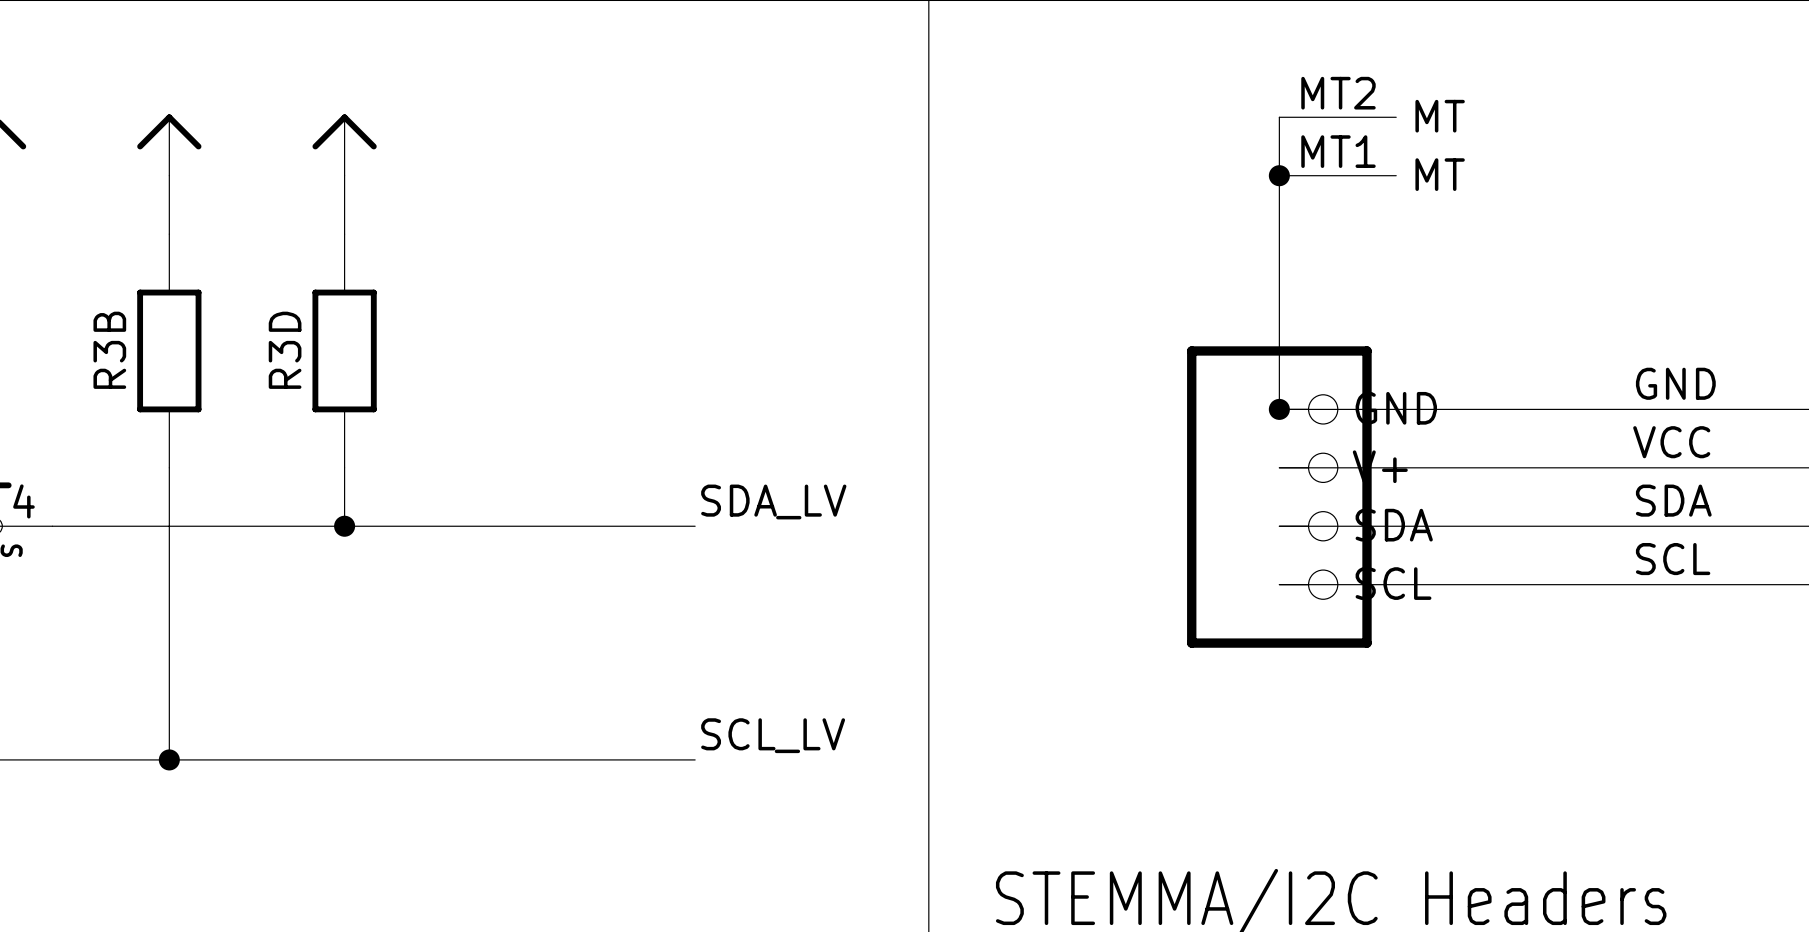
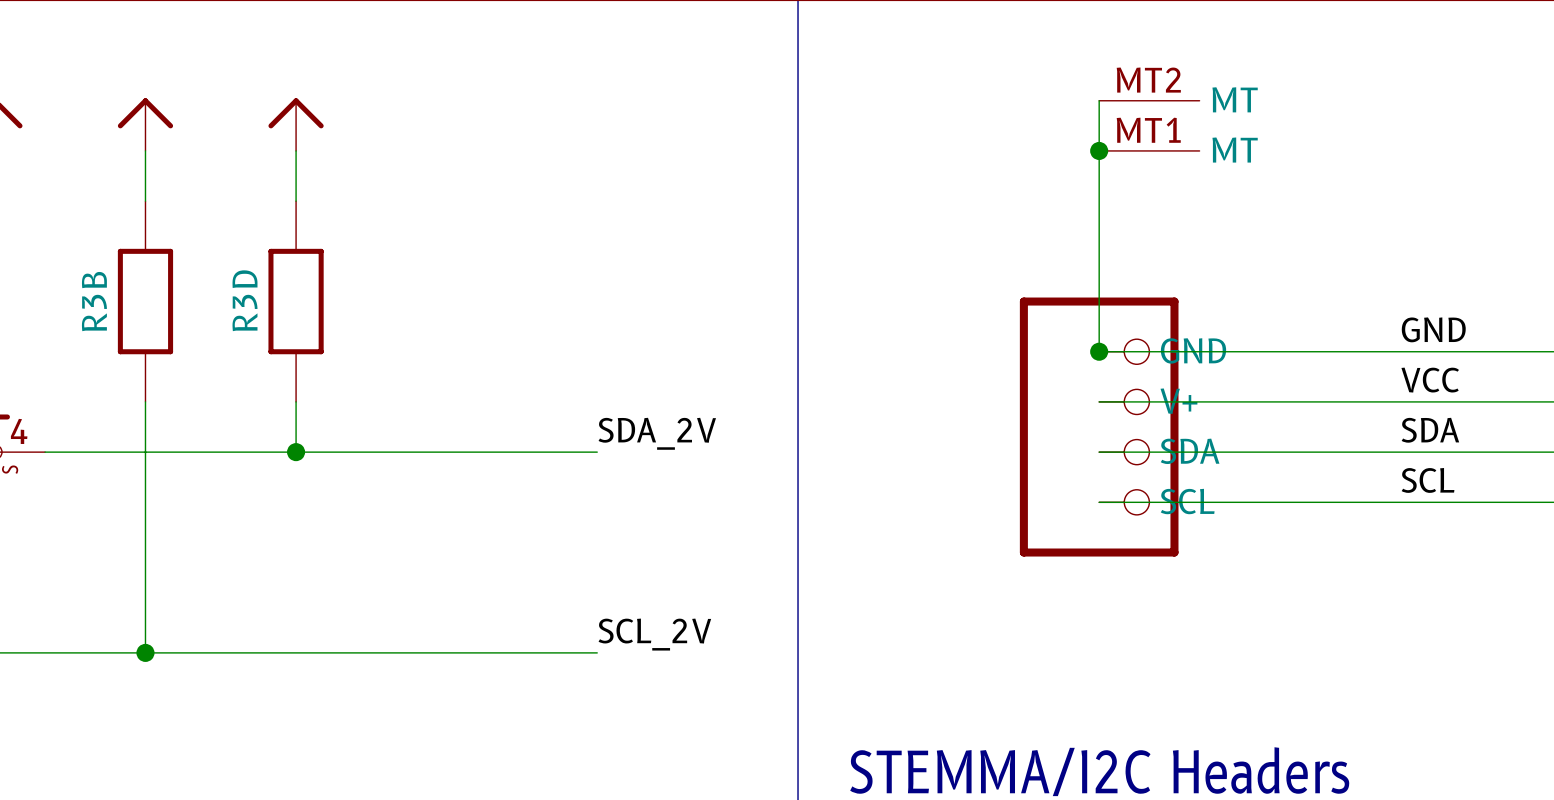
label: SDA_LV (773, 501) -> SDA_2V (657, 433)
label: SCL_LV (773, 735) -> SCL_2V (654, 634)

